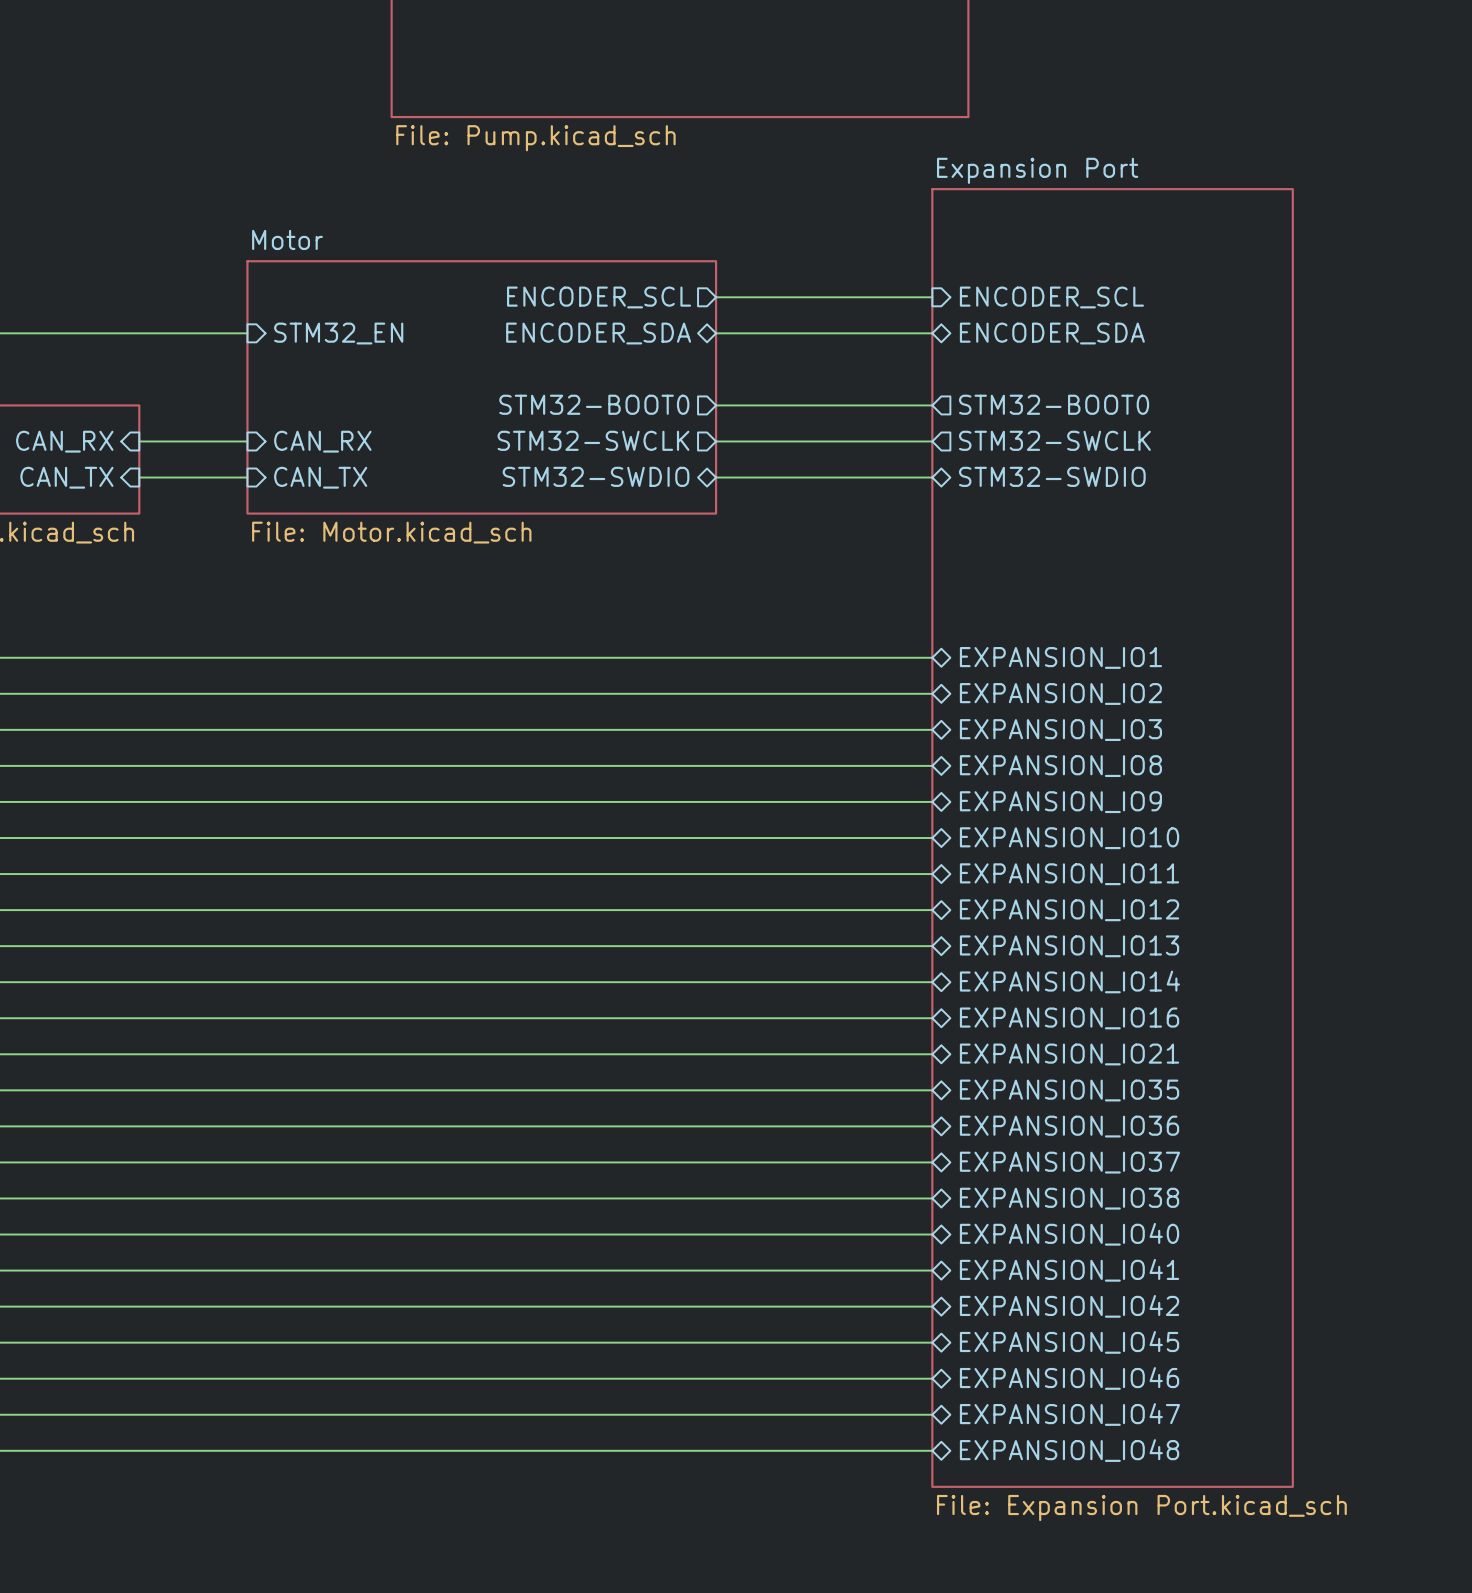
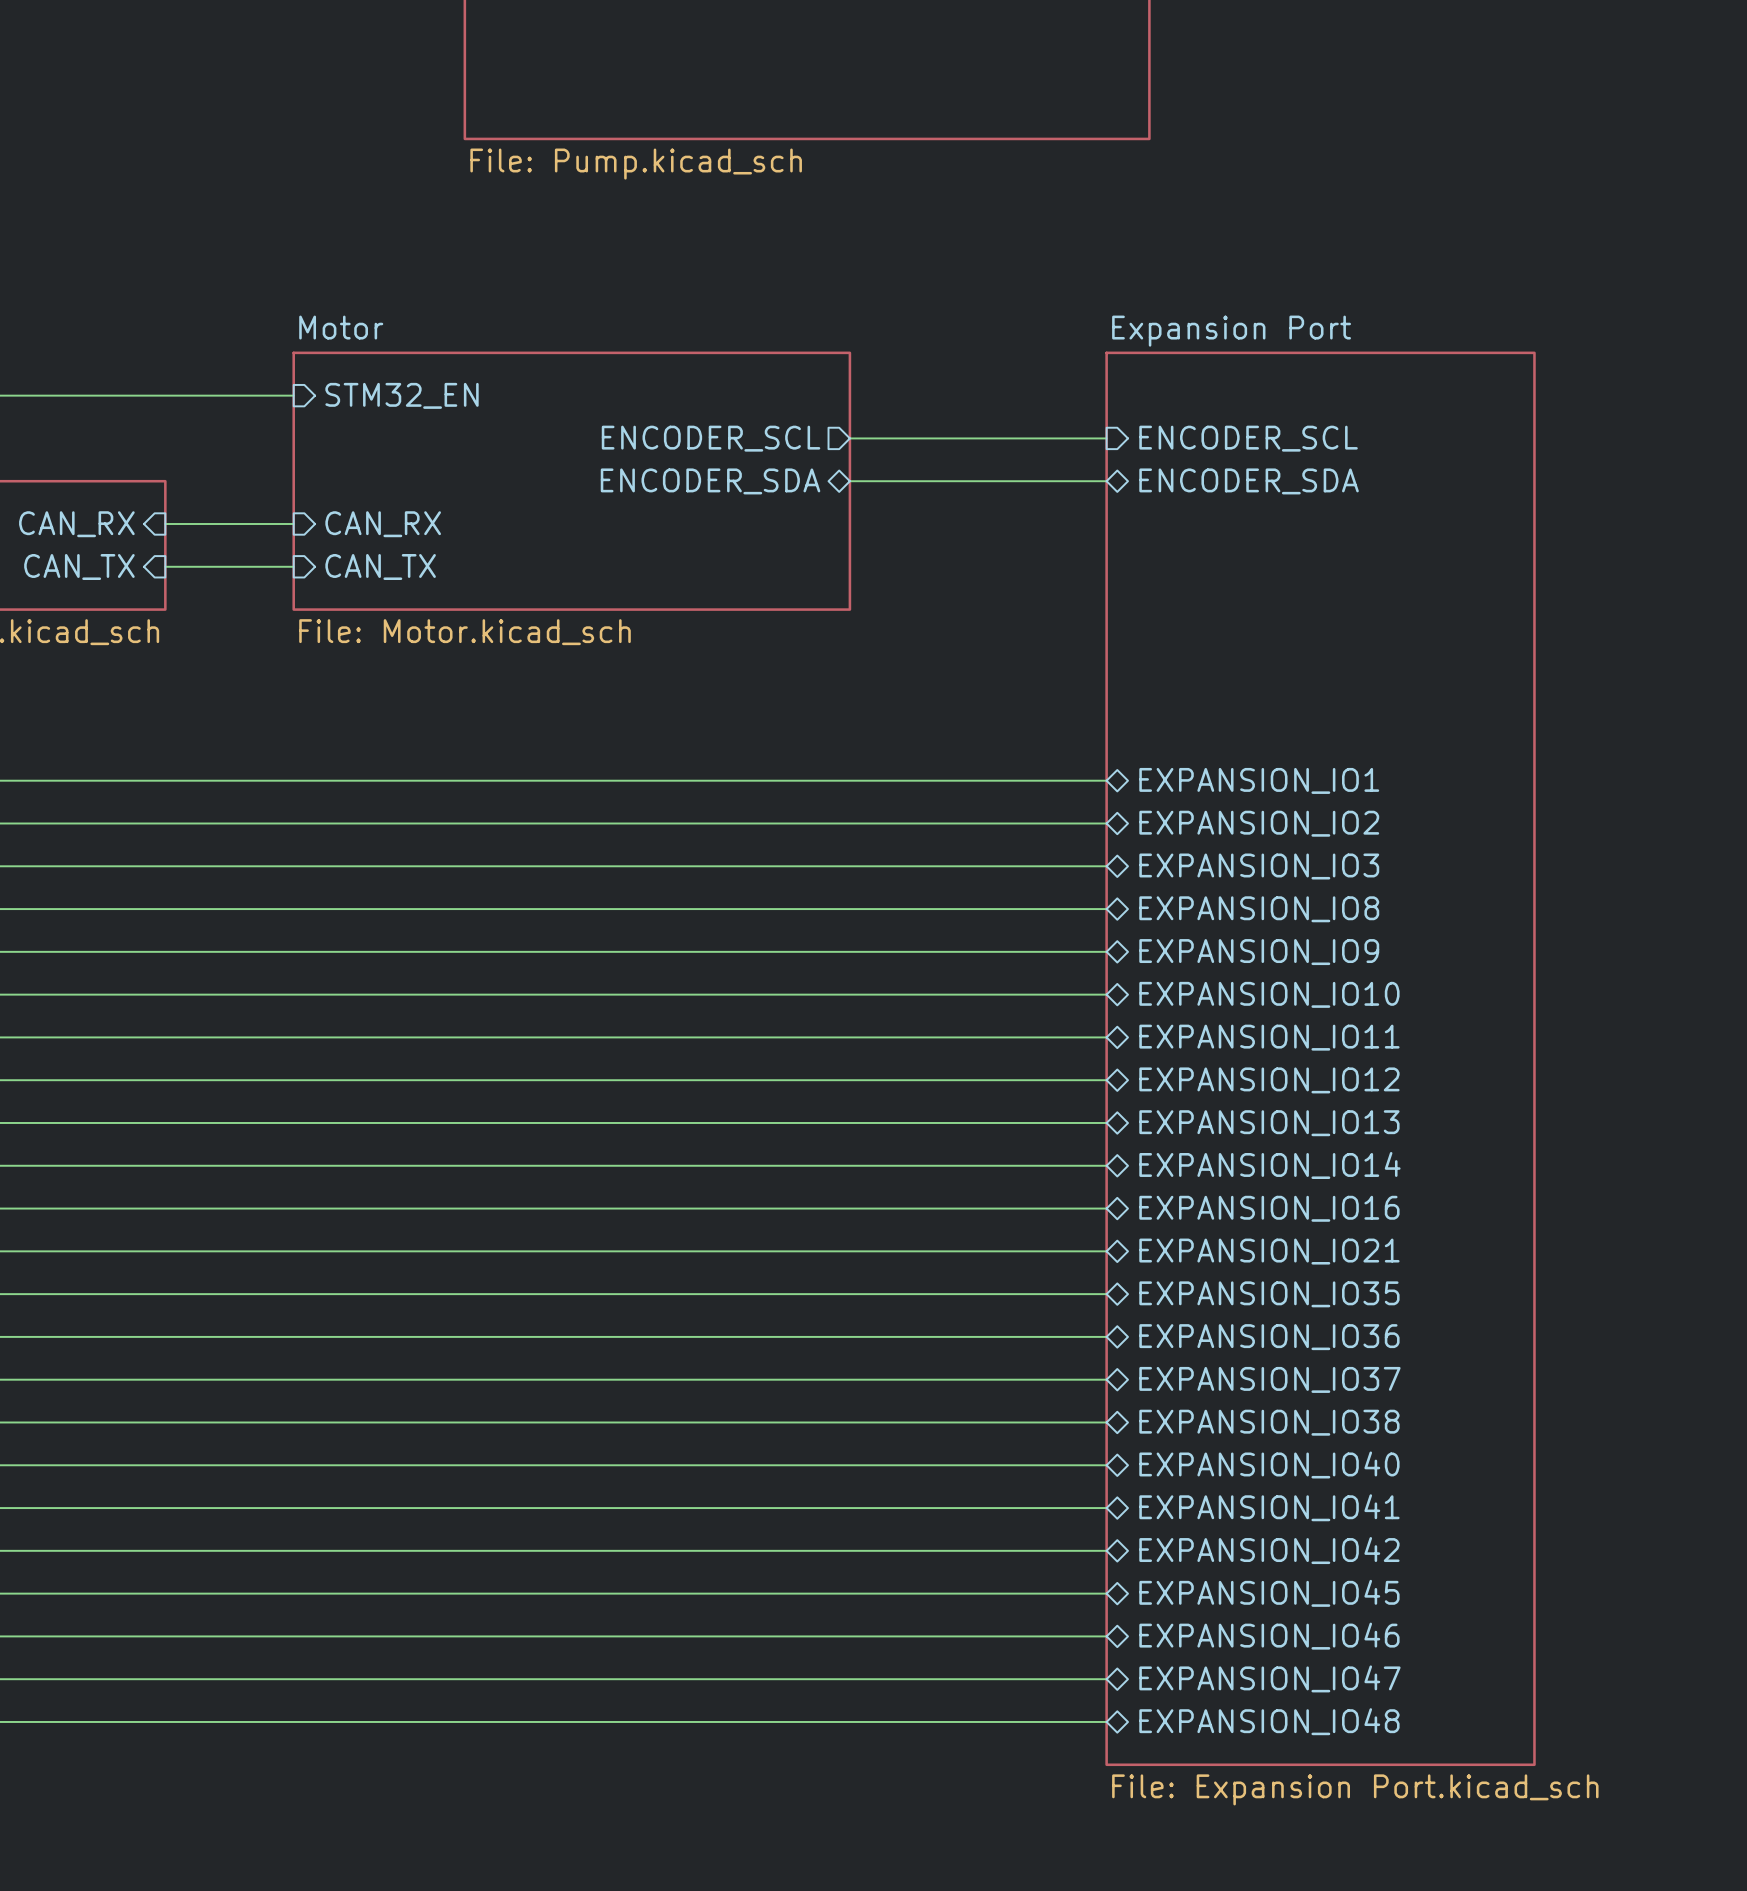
sheet pin position: ENCODER_SCL (599, 297) -> ENCODER_SCL (711, 438)
wire: (716, 297) (932, 297) -> none
sheet pin position: ENCODER_SCL (1051, 297) -> ENCODER_SCL (1248, 438)
sheet pin: ENCODER_SDA (598, 333) -> none
wire: (716, 333) (932, 333) -> (849, 438) (1106, 438)
sheet pin: ENCODER_SDA (1052, 333) -> none
sheet Motor: File: Motor.kicad_sch (481, 387) -> none
sheet pin shape: output (594, 404) -> bidirectional (710, 481)
sheet pin: STM32-BOOT0 (594, 404) -> ENCODER_SDA (710, 481)
sheet pin shape: output (1054, 404) -> bidirectional (1249, 481)
sheet pin: STM32-BOOT0 (1054, 404) -> ENCODER_SDA (1249, 481)
sheet Motor: none -> File: Motor.kicad_sch (571, 481)
sheet pin: STM32-SWCLK (593, 440) -> none
sheet pin: STM32-SWCLK (1054, 440) -> none
wire: (716, 441) (932, 441) -> none
sheet pin: STM32-SWDIO (596, 476) -> none
sheet pin: STM32-SWDIO (1052, 476) -> none
wire: (716, 477) (932, 477) -> none
sheet Expansion Port: File: Expansion Port.kicad_sch (1112, 837) -> none
sheet Expansion Port: none -> File: Expansion Port.kicad_sch (1320, 1058)

